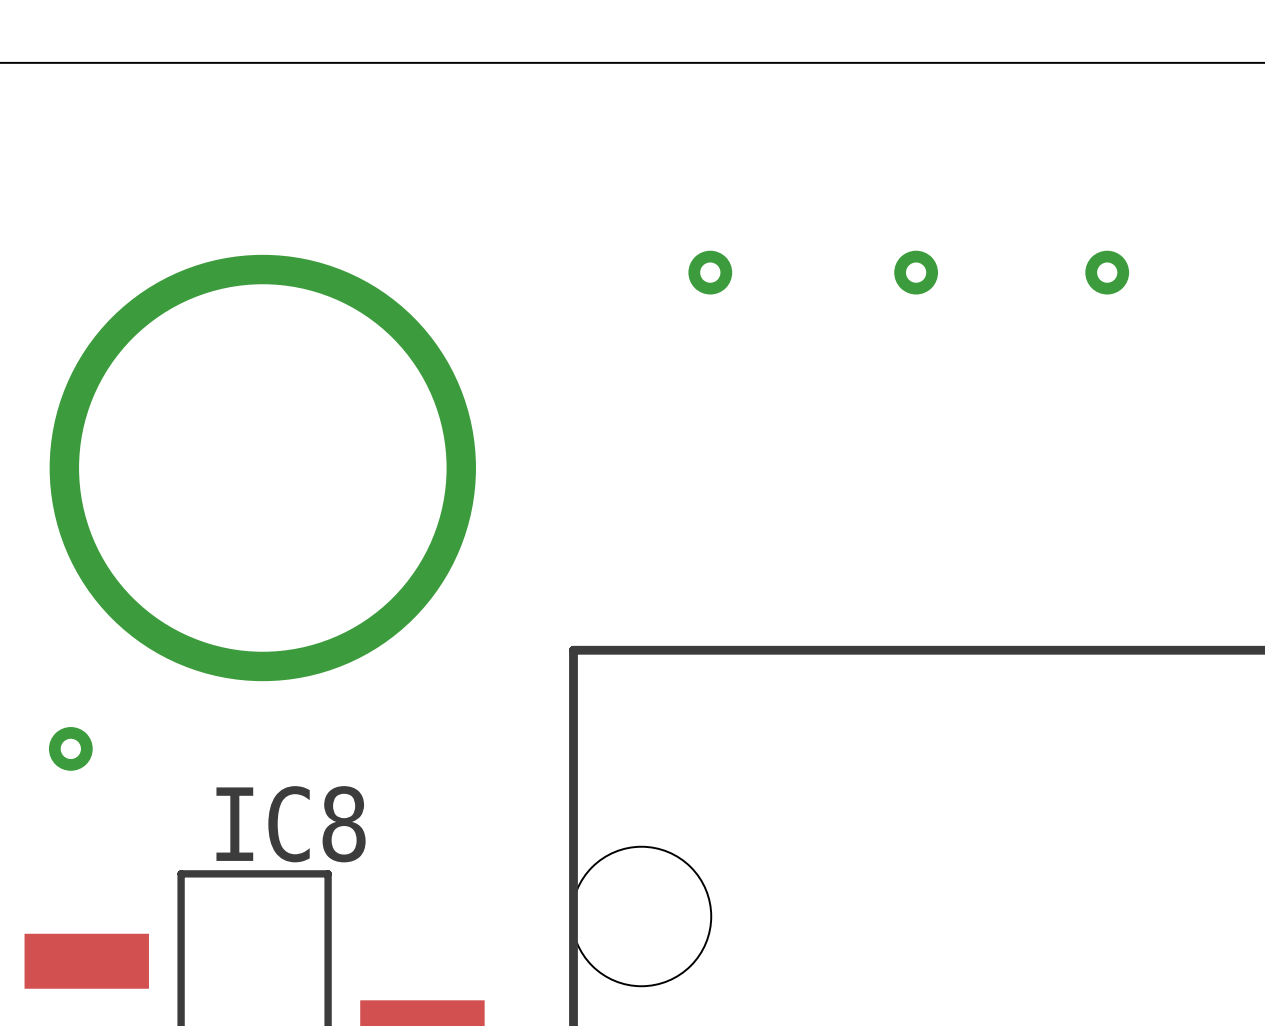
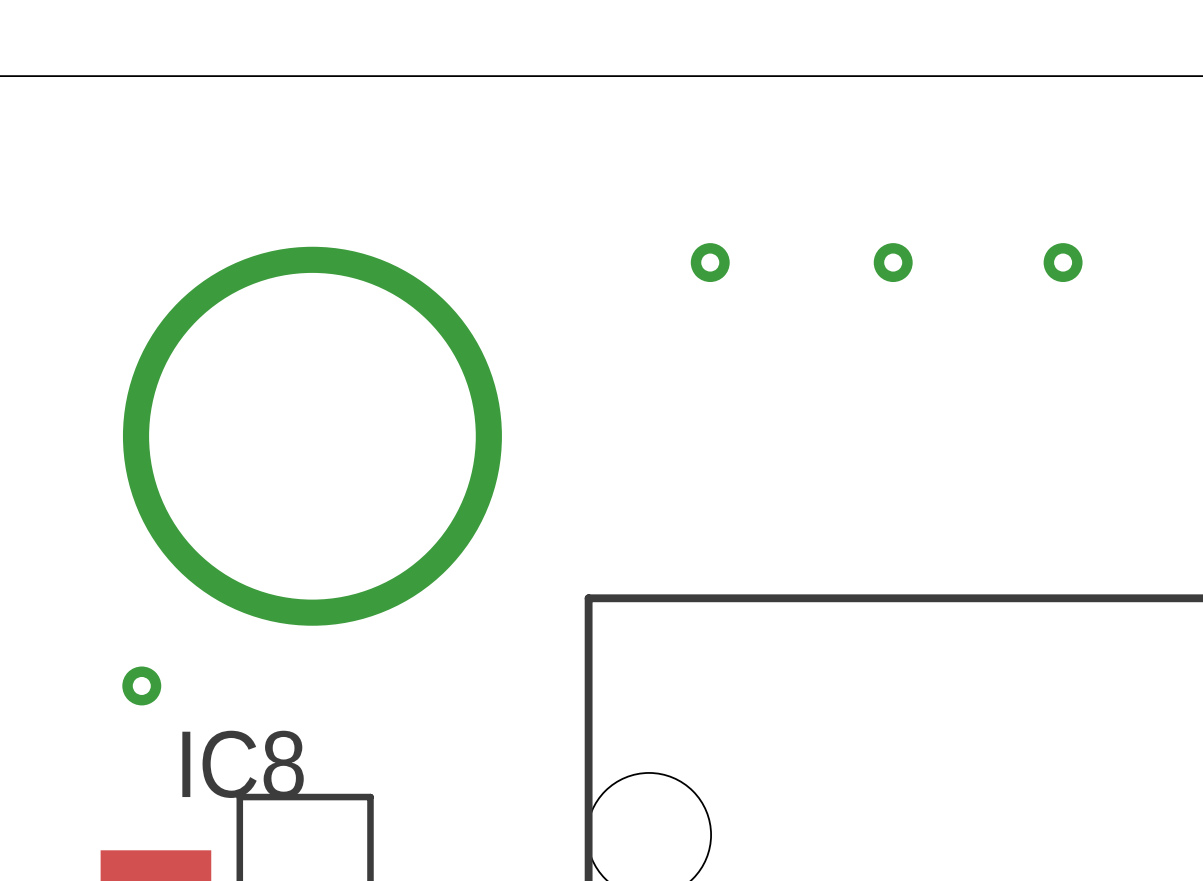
IC8 name position: IC8 (291, 824) -> IC8 (243, 764)

